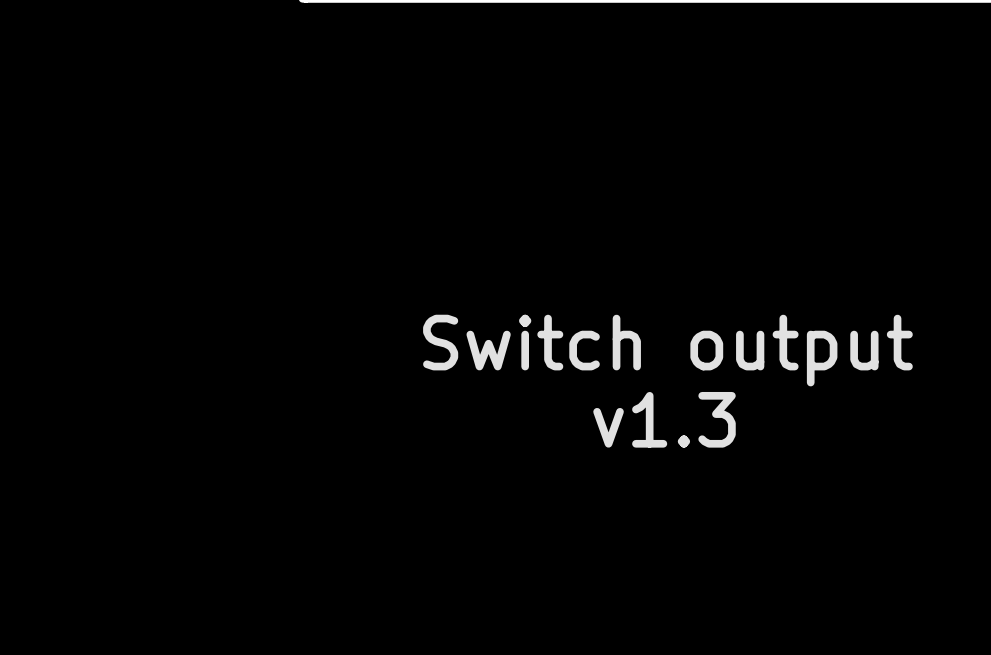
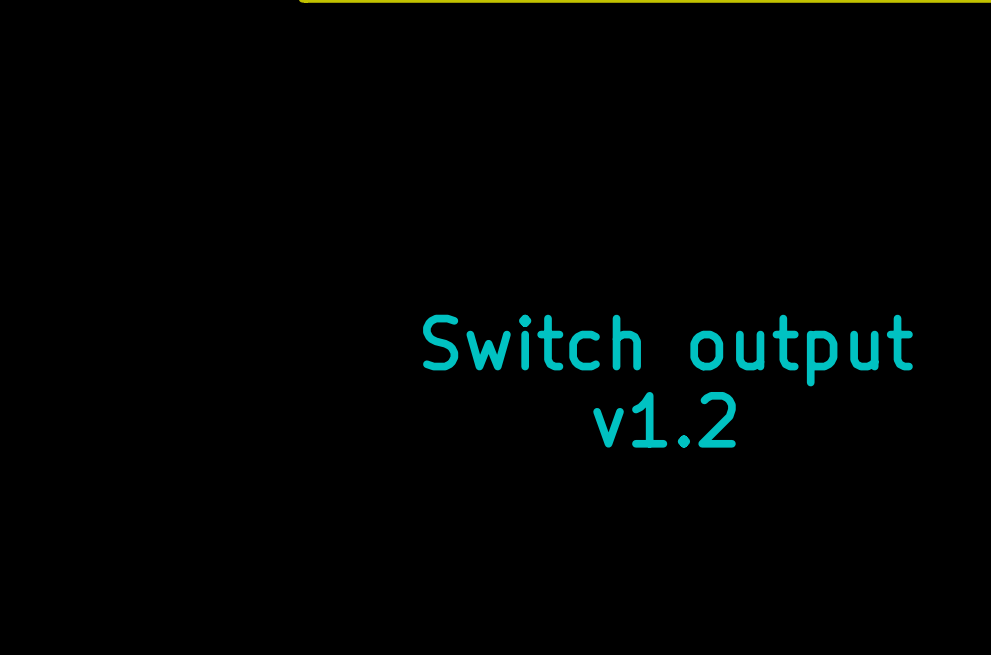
text: v1.3 (664, 419) -> v1.2 (664, 419)

